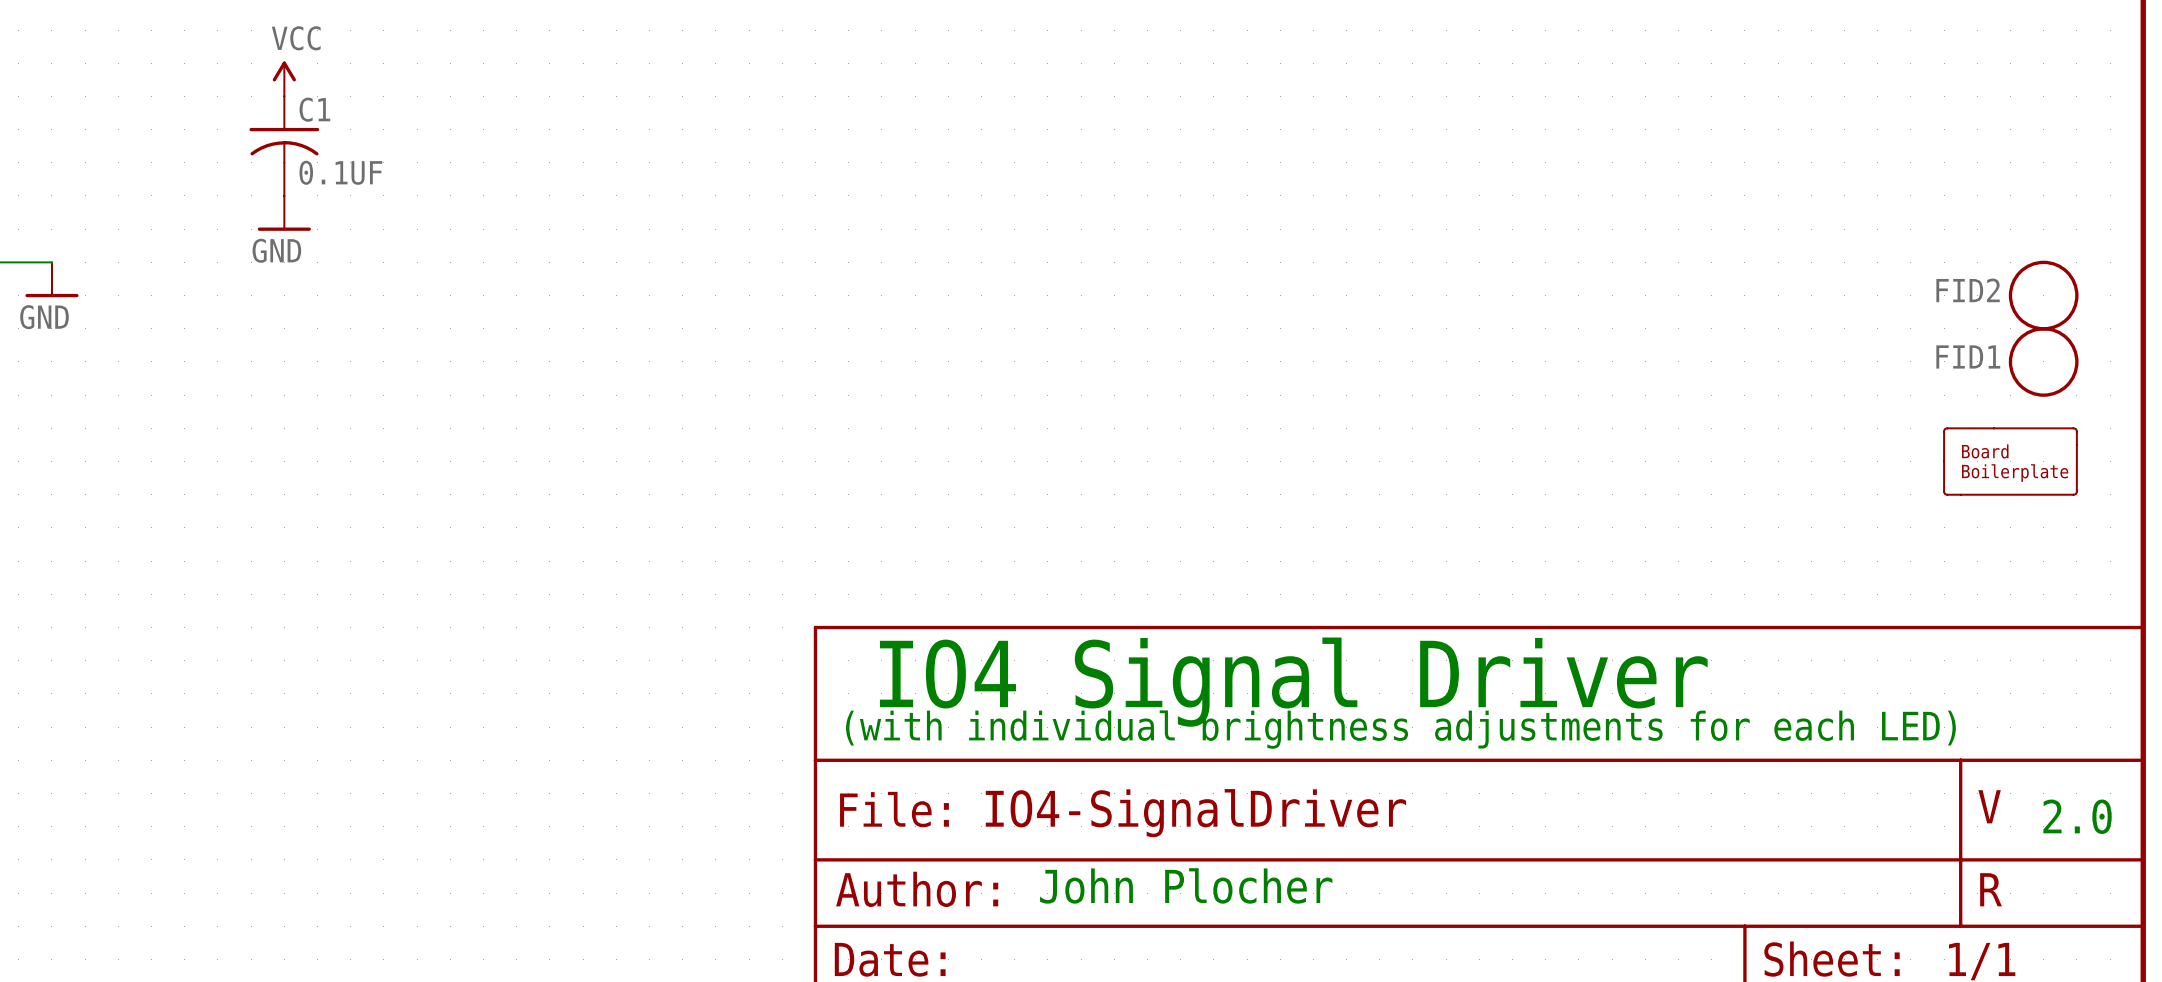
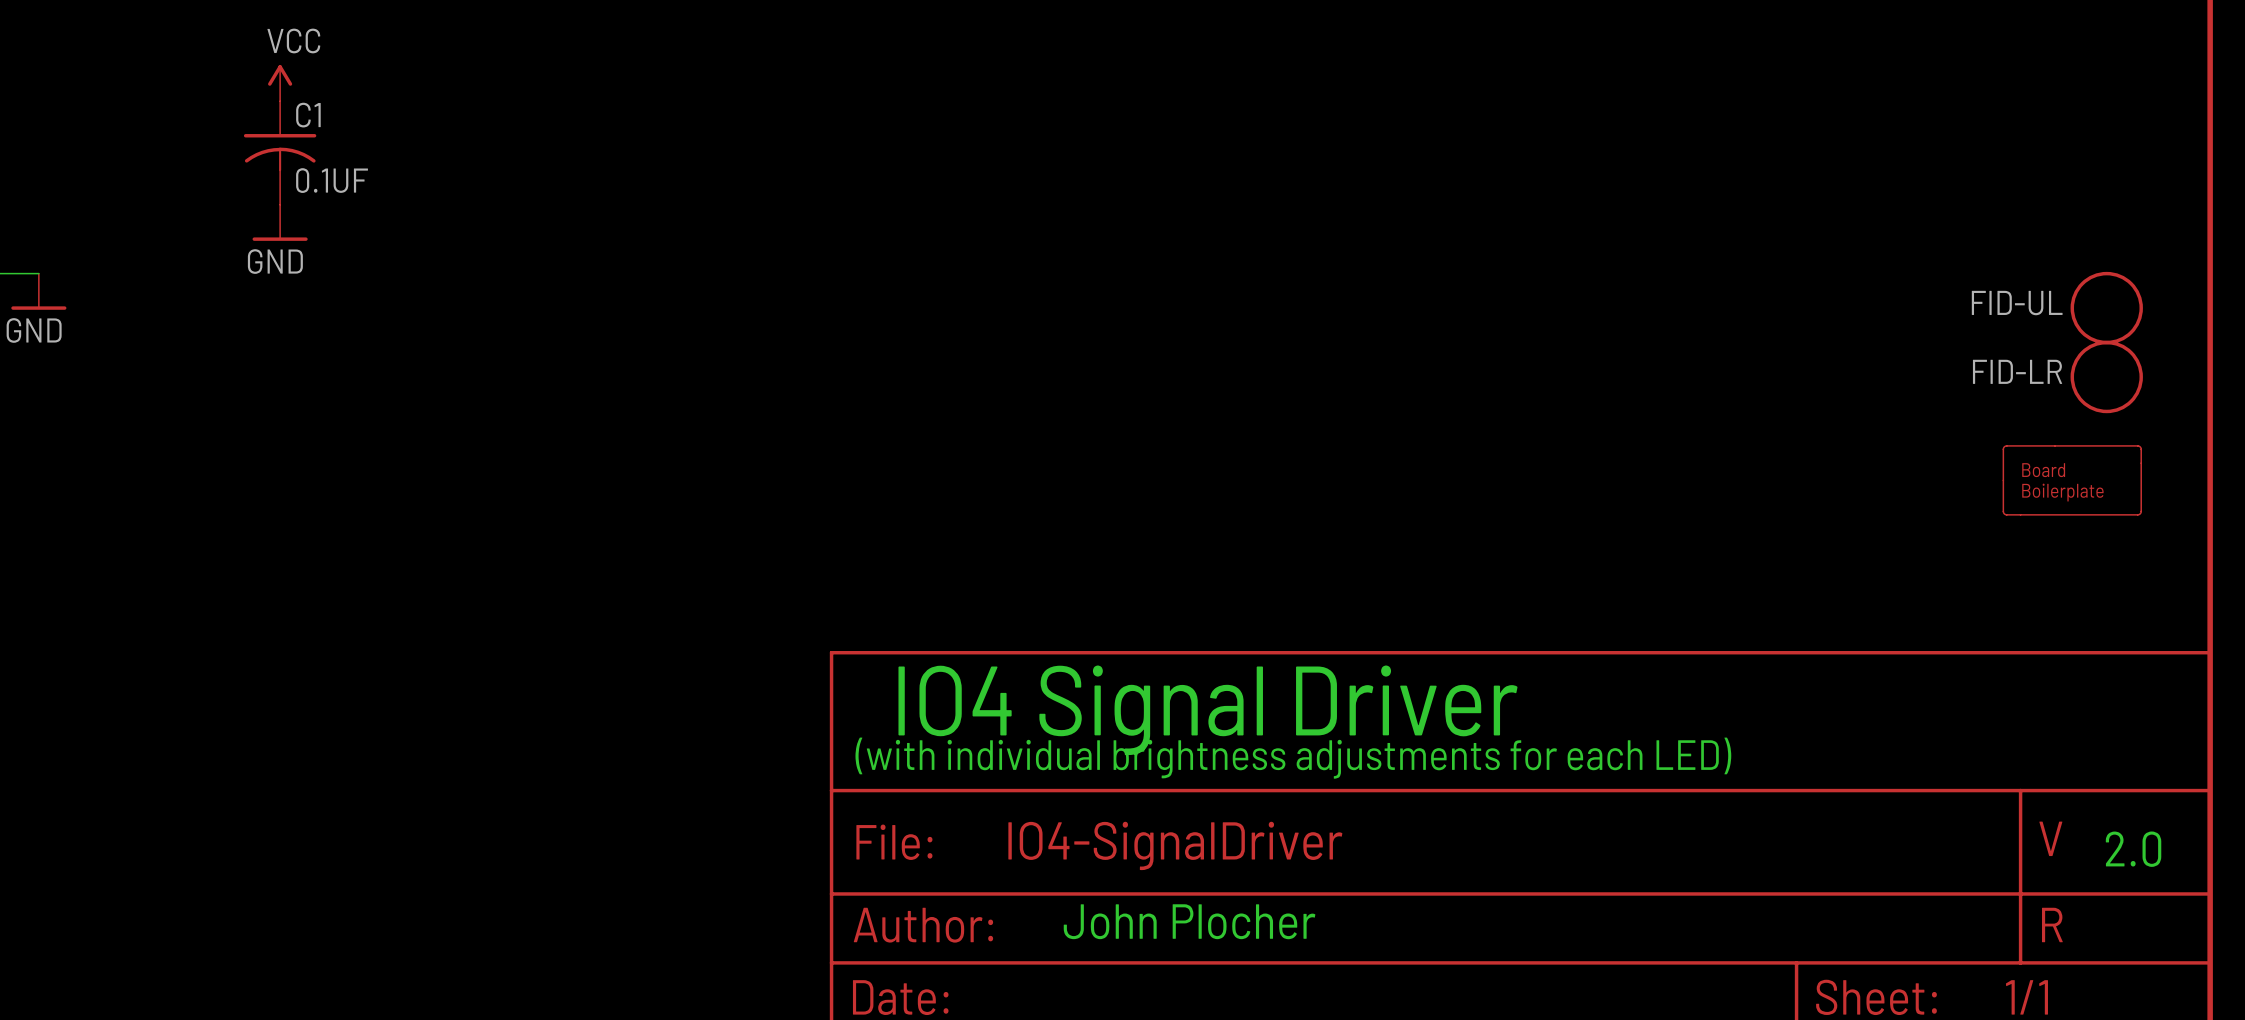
FID2 name: FID2 (1968, 290) -> FID-UL (2017, 303)
FID1 name: FID1 (1968, 356) -> FID-LR (2017, 371)

